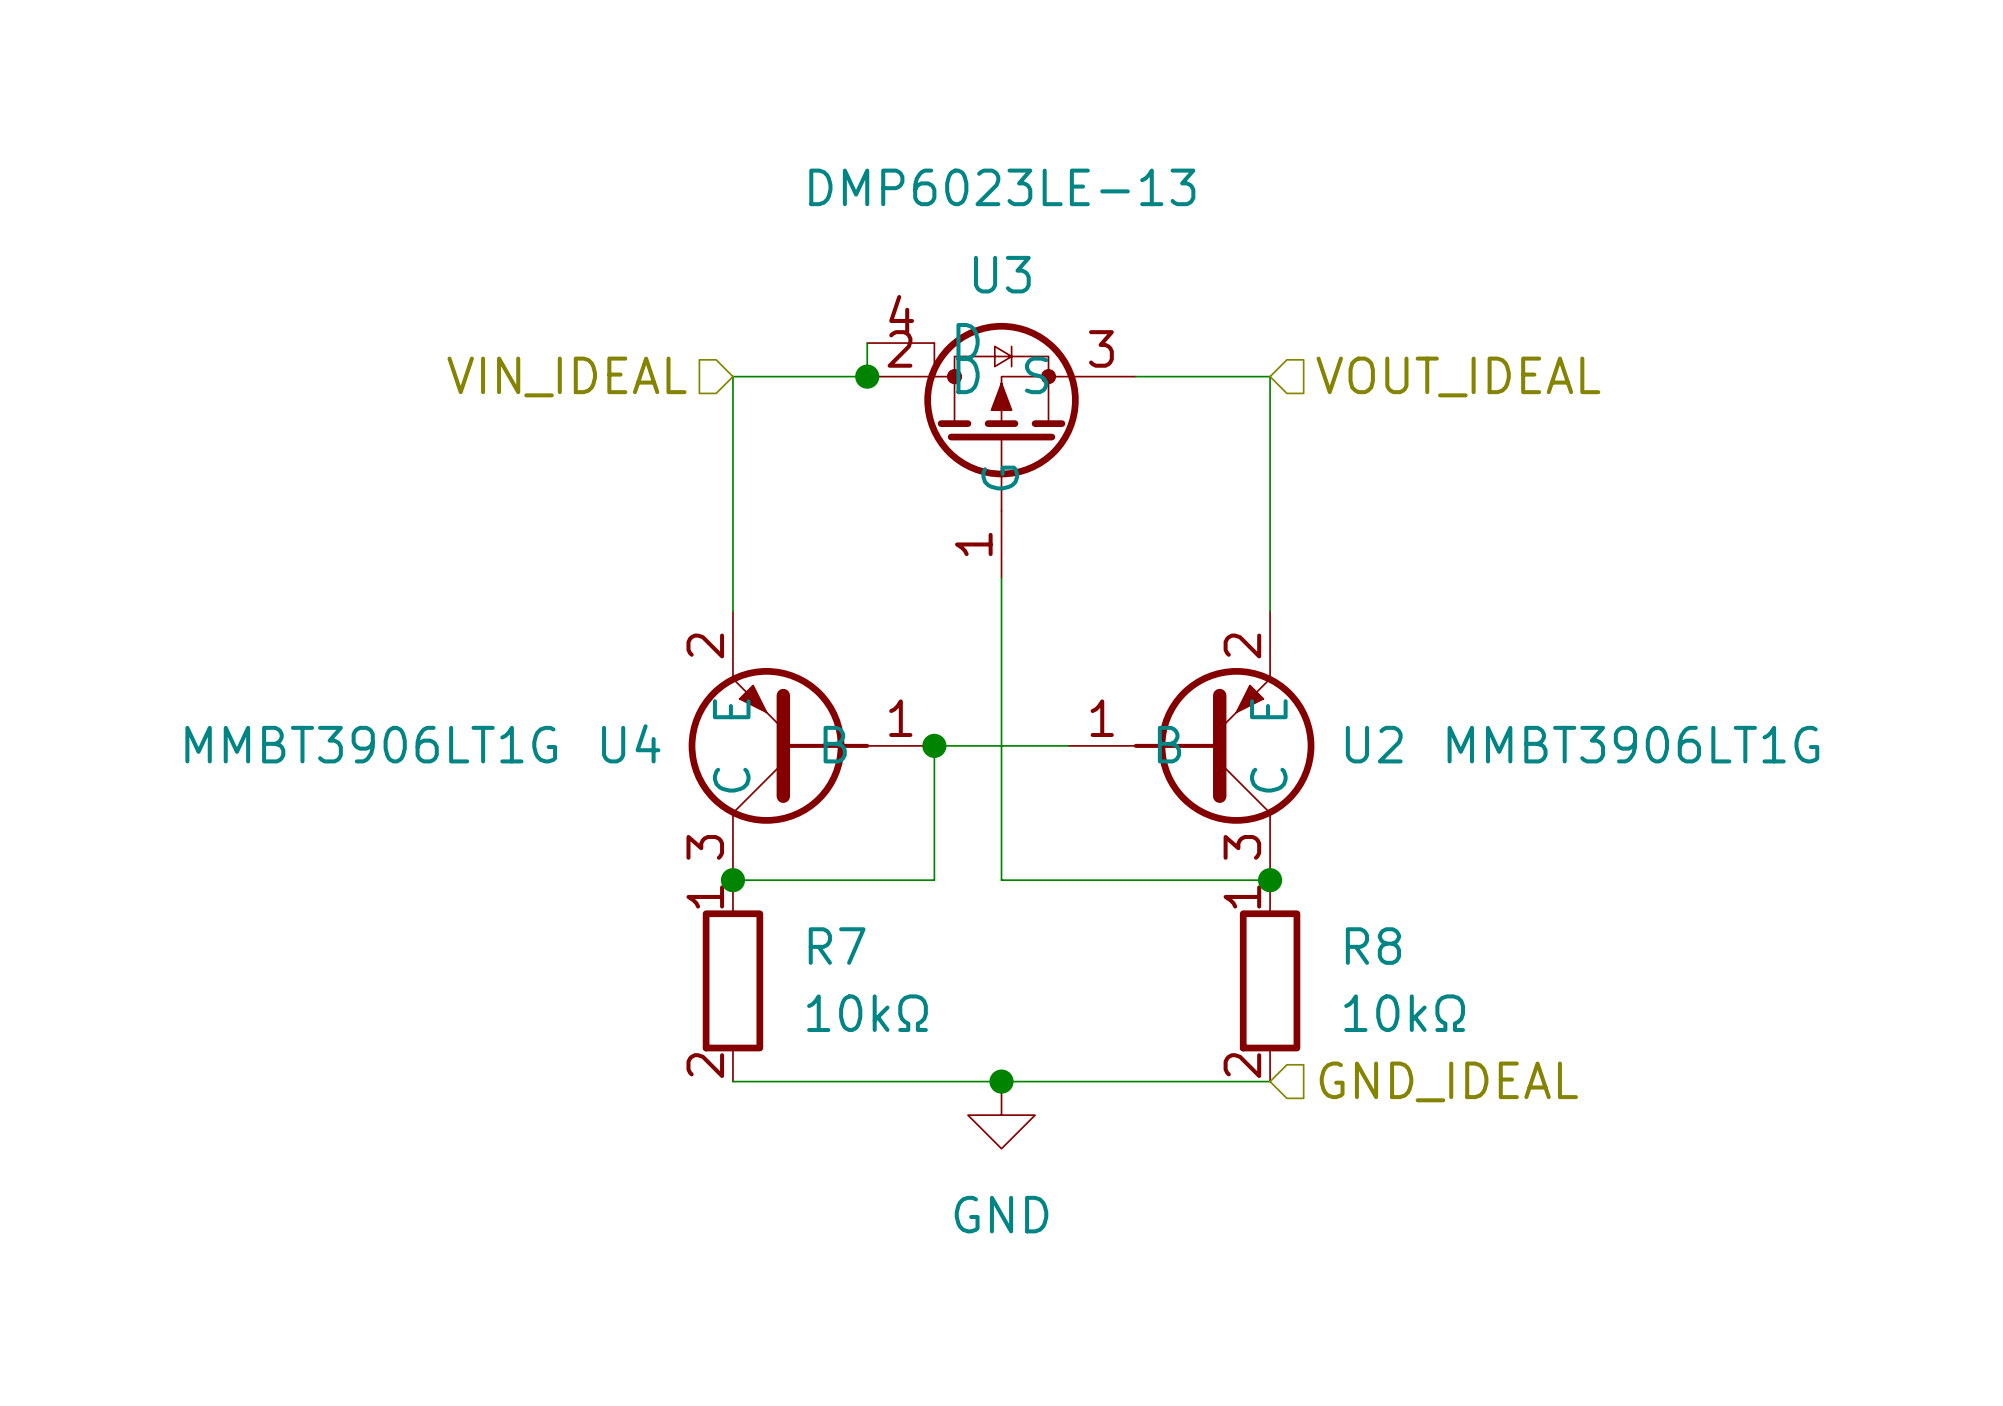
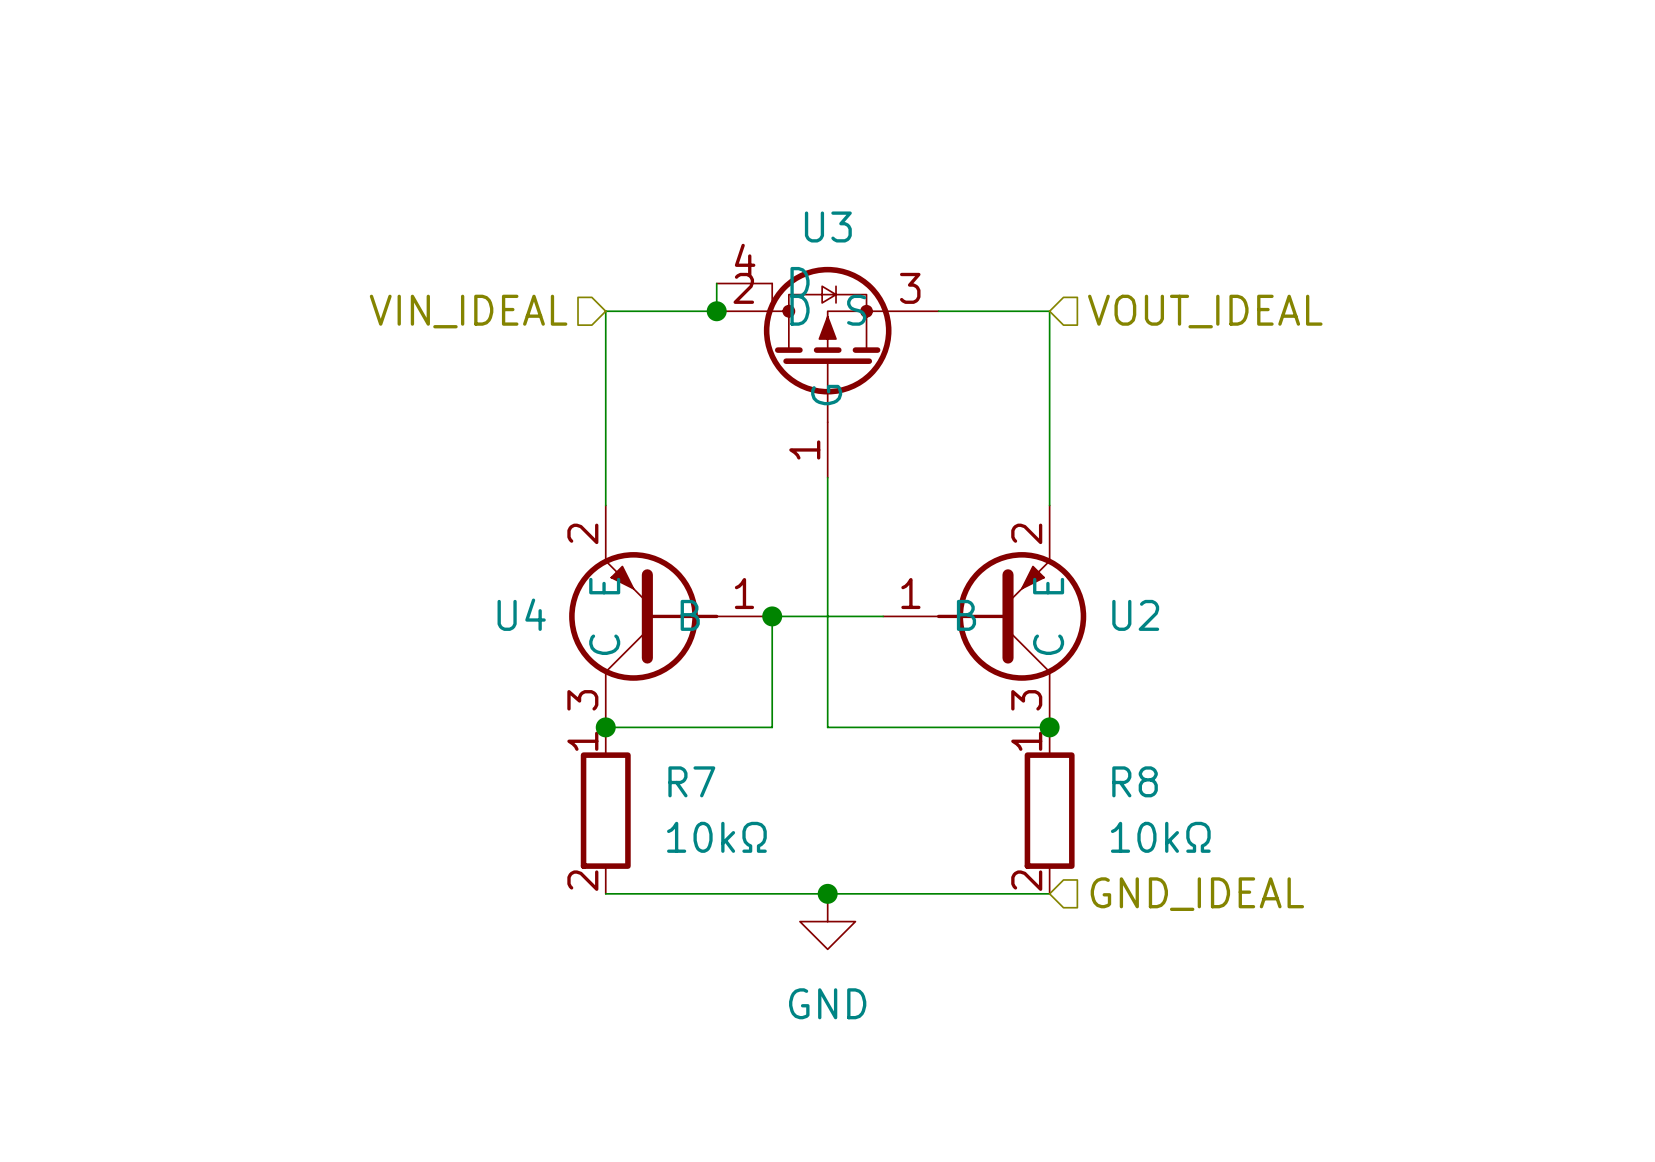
U3 value: DMP6023LE-13 (1002, 187) -> none
U4 value: MMBT3906LT1G (371, 744) -> none
U2 value: MMBT3906LT1G (1633, 744) -> none

